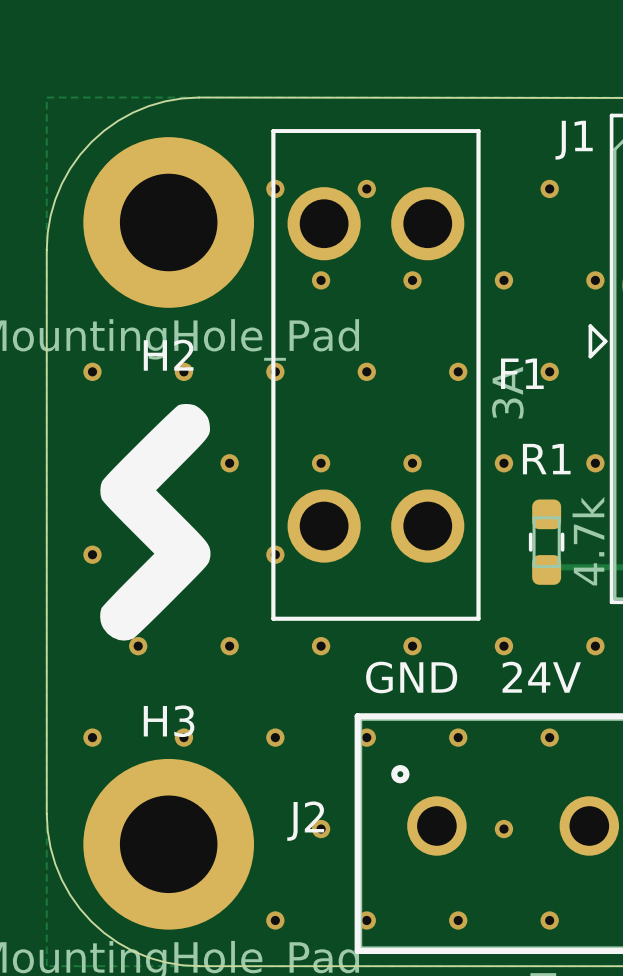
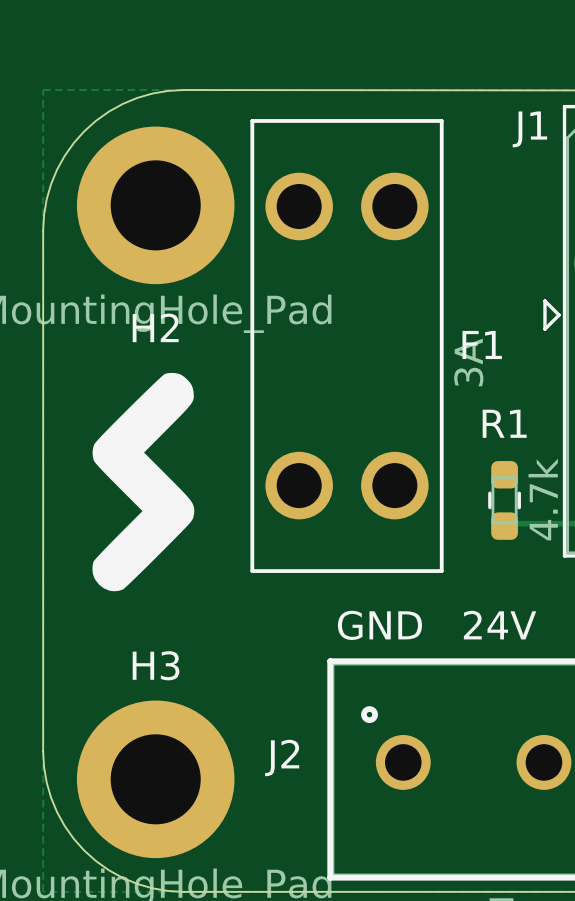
via: (275, 188) -> none
via: (366, 188) -> none
via: (549, 188) -> none
via: (321, 280) -> none
via: (412, 280) -> none
via: (503, 280) -> none
via: (595, 280) -> none
via: (92, 371) -> none
via: (183, 371) -> none
via: (275, 371) -> none
via: (366, 371) -> none
via: (458, 371) -> none
via: (549, 371) -> none
via: (229, 463) -> none
via: (321, 463) -> none
via: (412, 463) -> none
via: (503, 463) -> none
via: (595, 463) -> none
via: (92, 554) -> none
via: (275, 554) -> none
via: (138, 646) -> none
via: (229, 646) -> none
via: (321, 646) -> none
via: (412, 646) -> none
via: (503, 646) -> none
via: (595, 646) -> none
via: (92, 737) -> none
via: (183, 737) -> none
via: (275, 737) -> none
via: (366, 737) -> none
via: (458, 737) -> none
via: (549, 737) -> none
via: (321, 829) -> none
via: (503, 829) -> none
via: (275, 920) -> none
via: (366, 920) -> none
via: (458, 920) -> none
via: (549, 920) -> none

